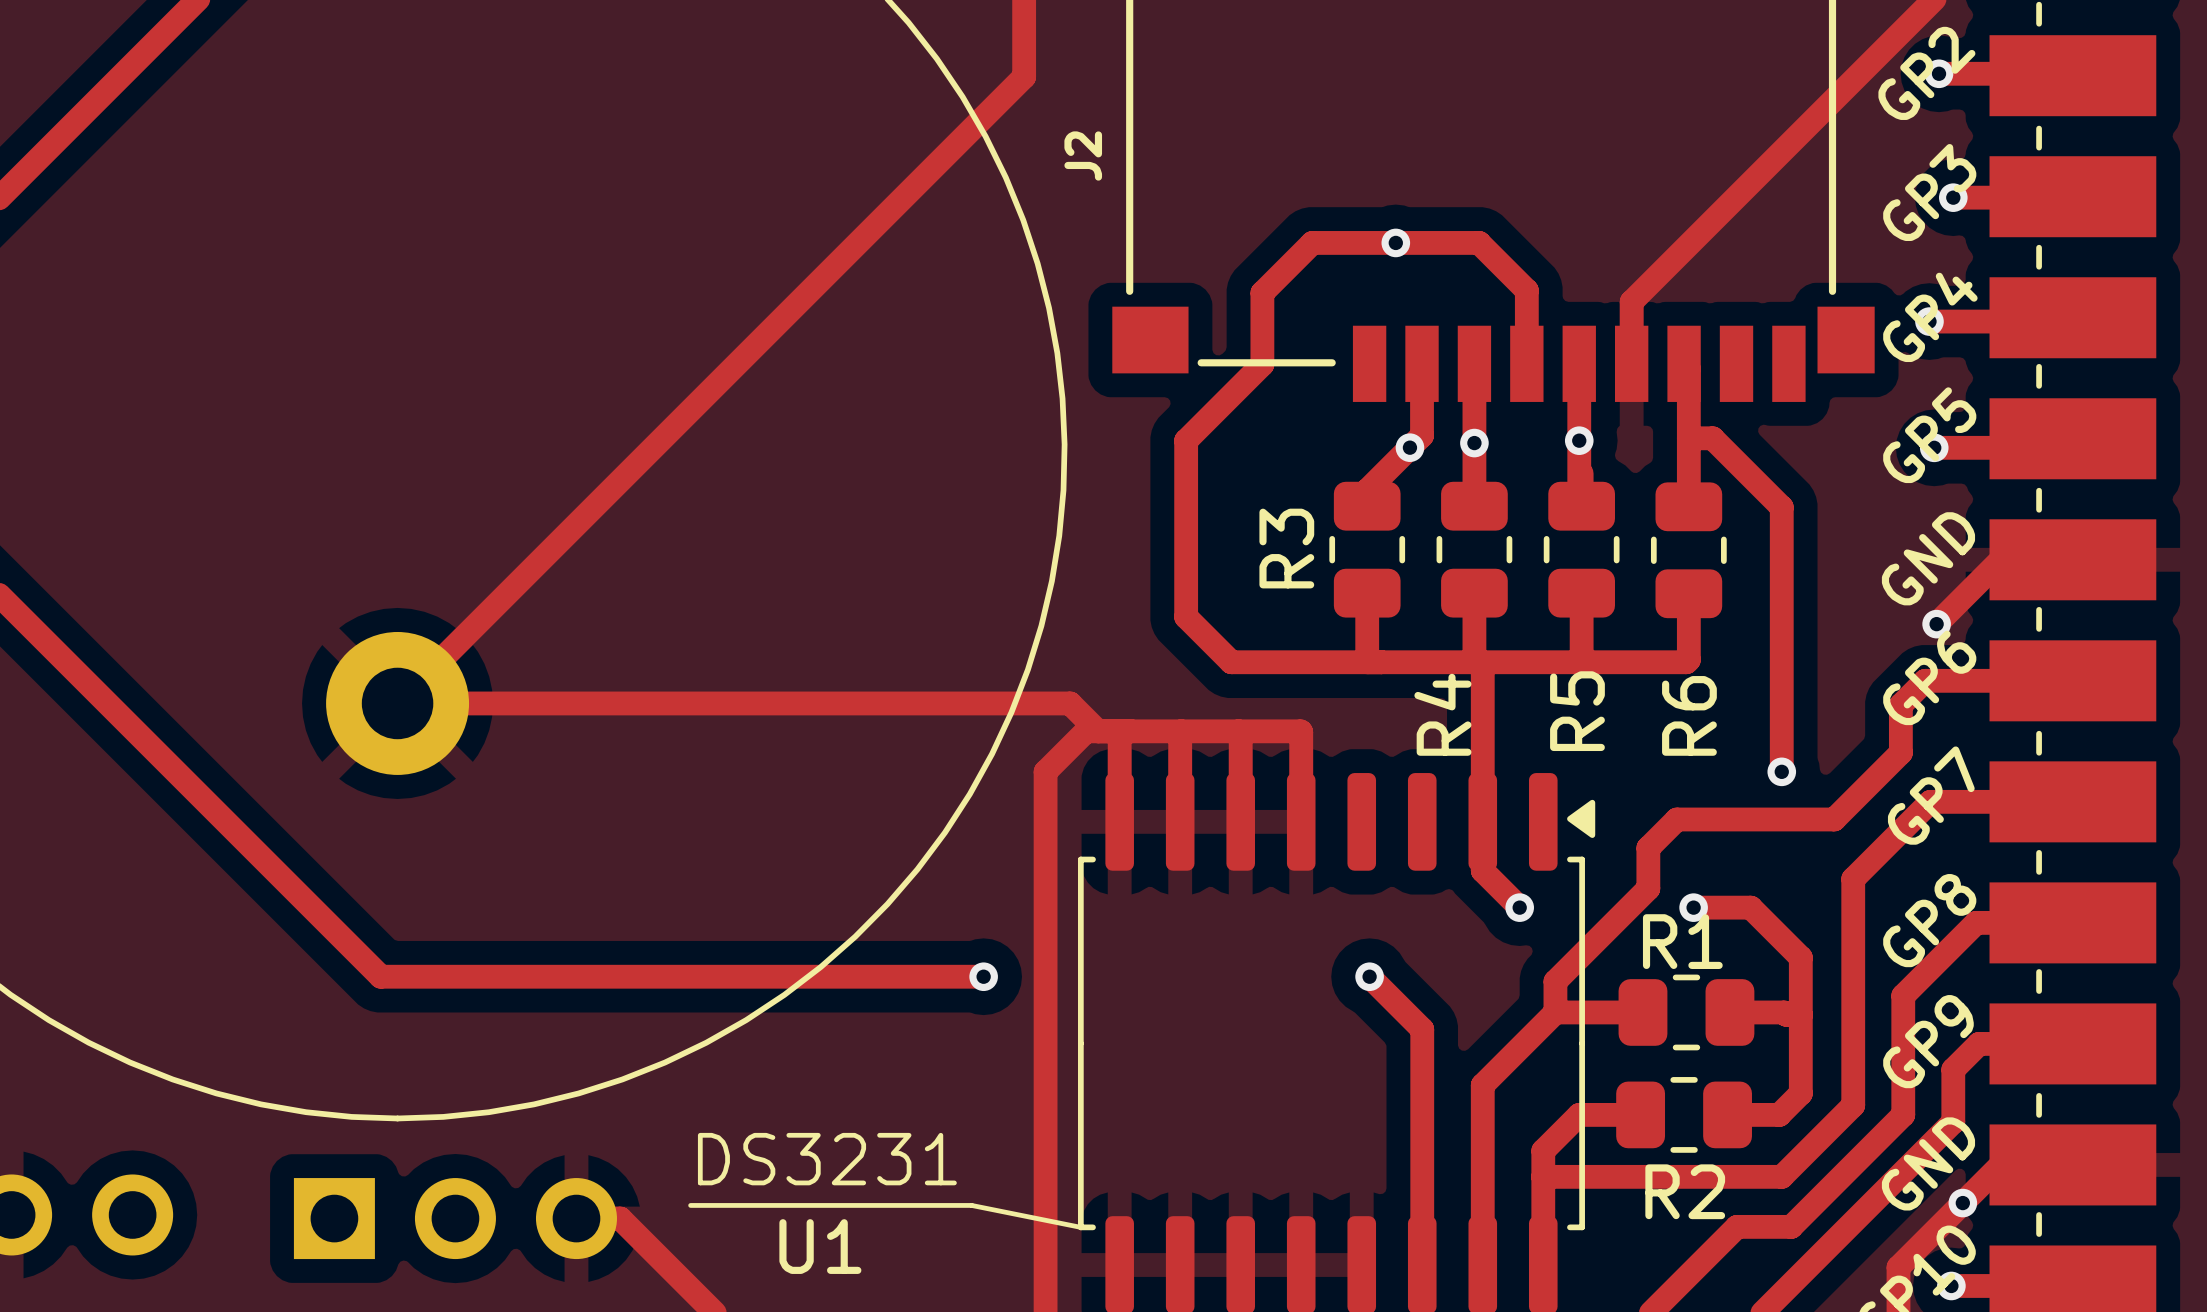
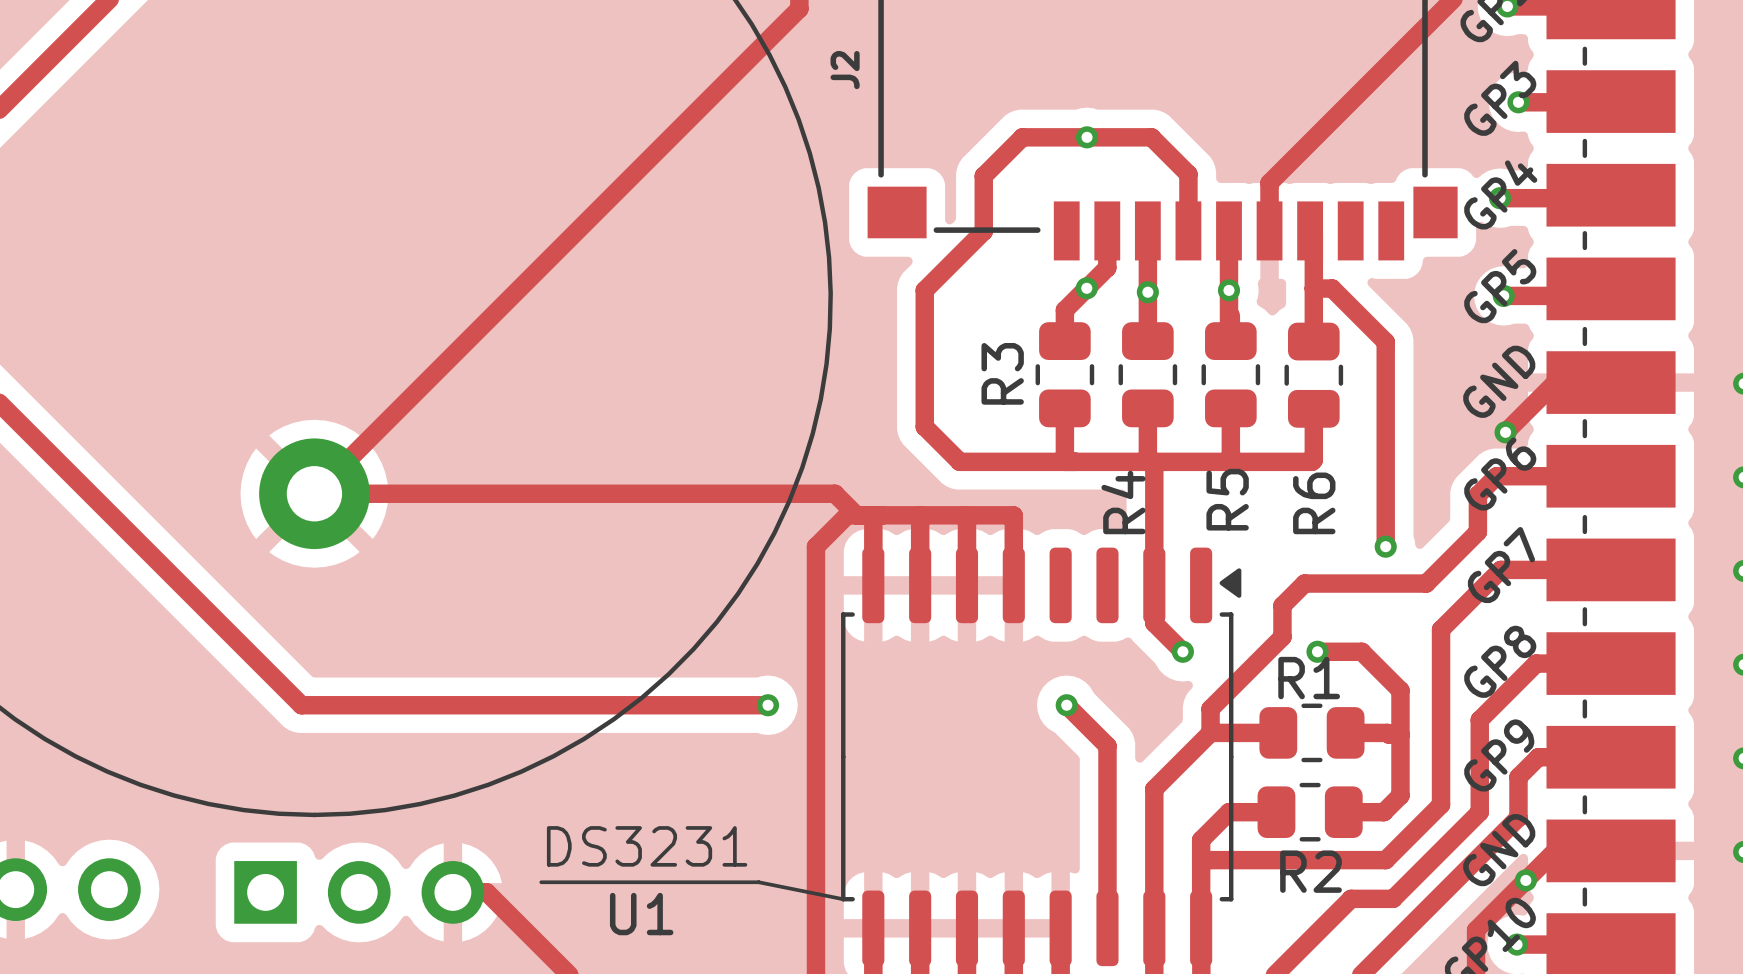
track: (1422, 411) (1422, 435) (1367, 490) -> (1107, 267) (1064, 310) (1064, 328)
via position: (1409, 447) -> (1086, 288)

